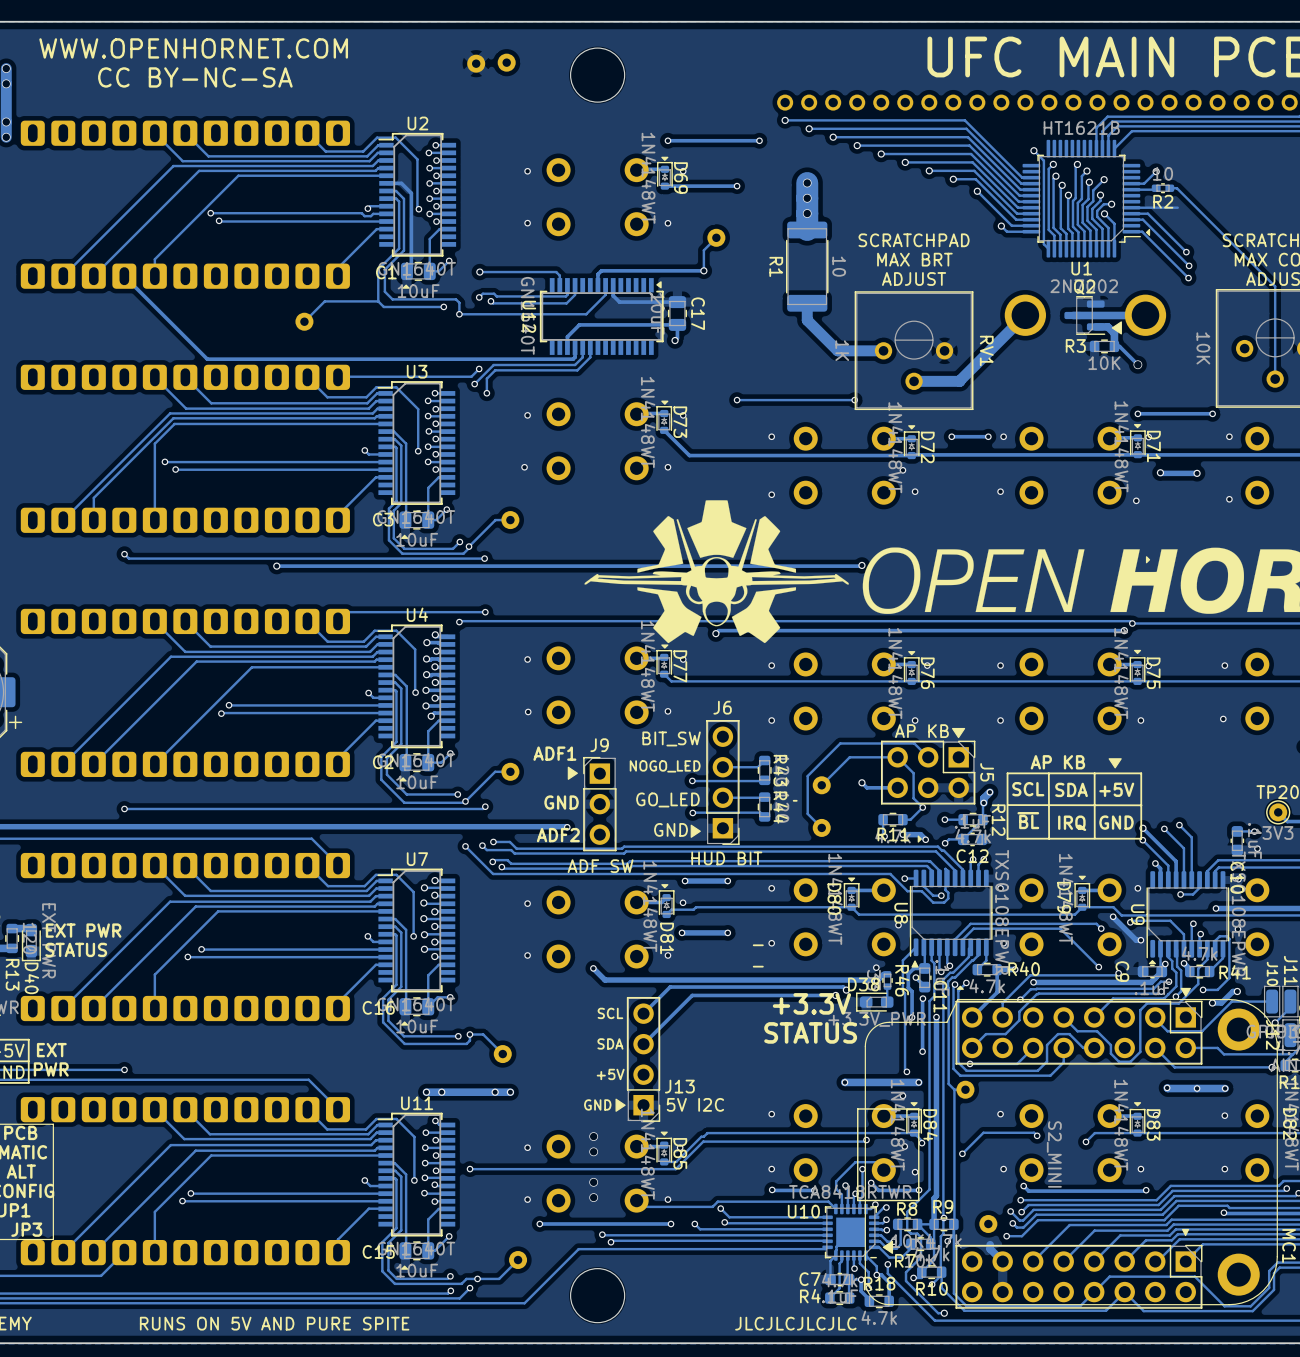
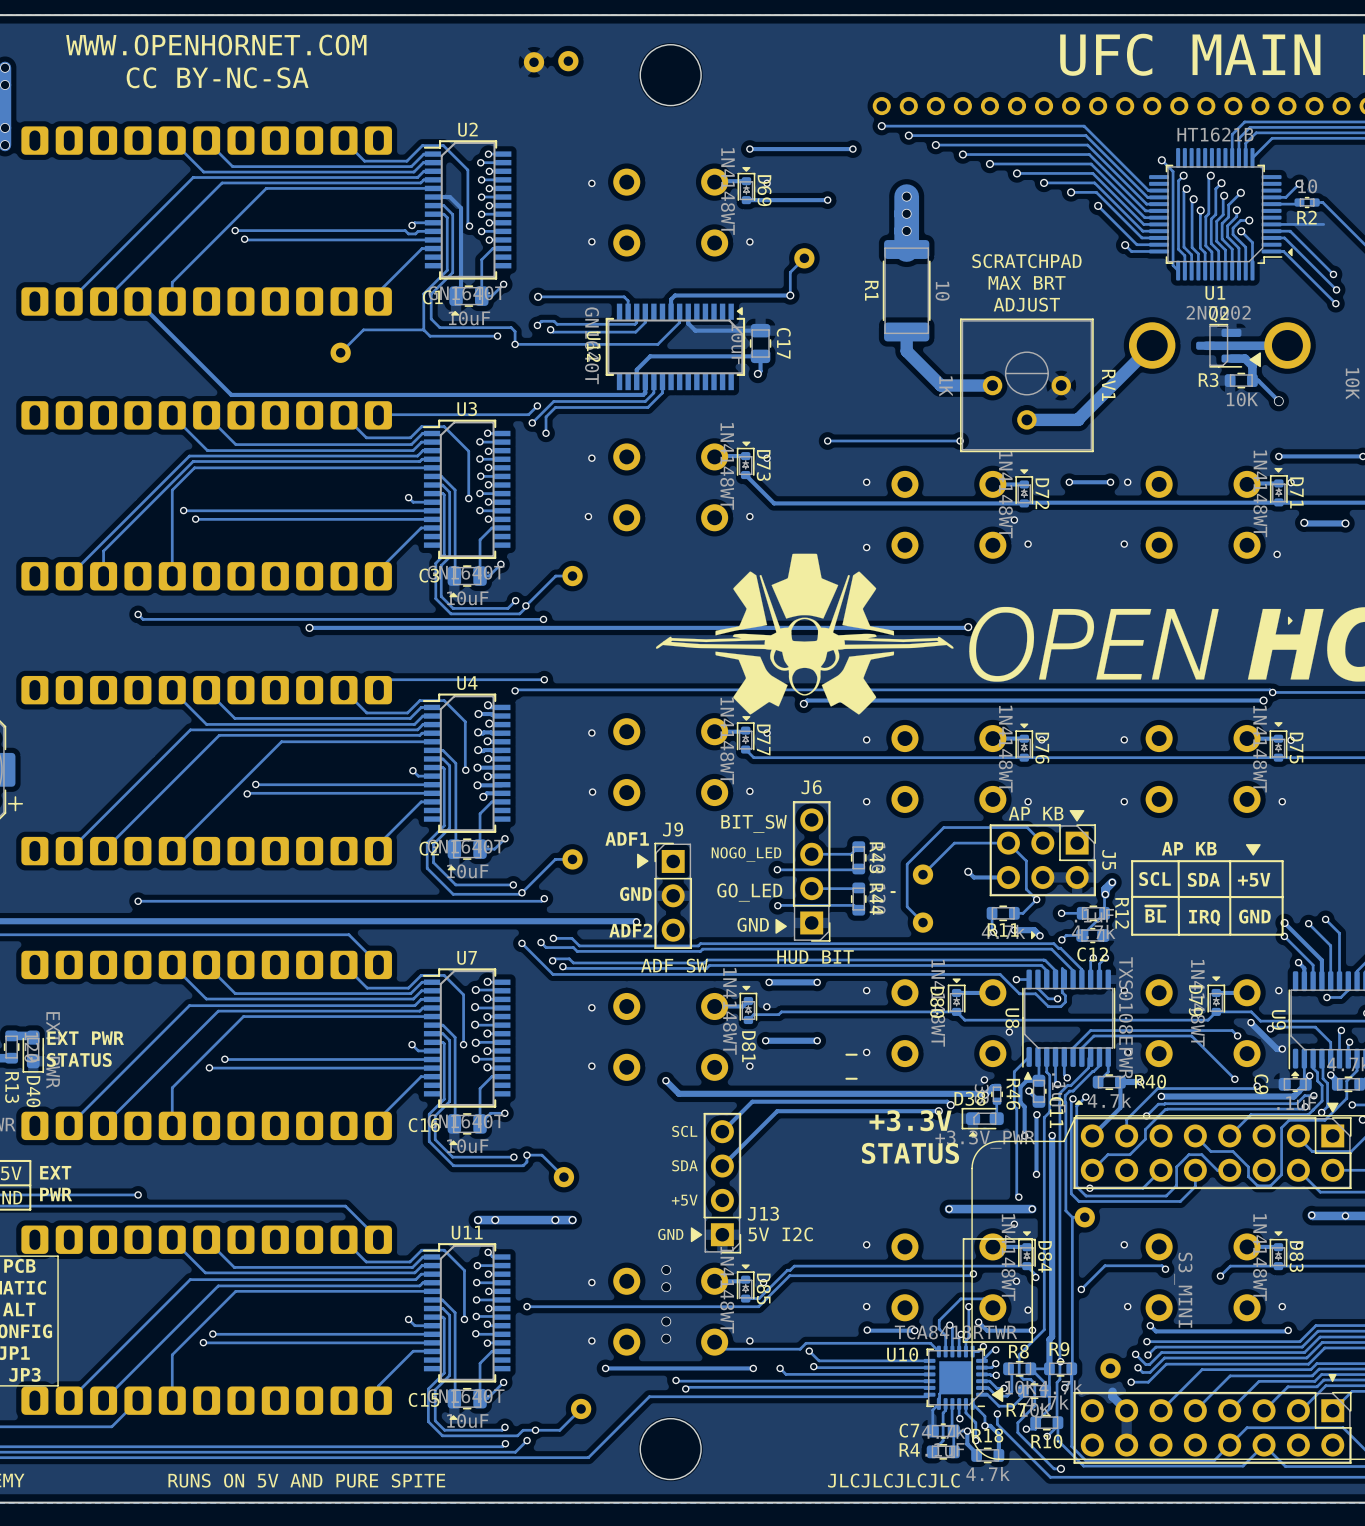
MC1 value: S2_MINI (1054, 1154) -> S3_MINI (1183, 1290)

